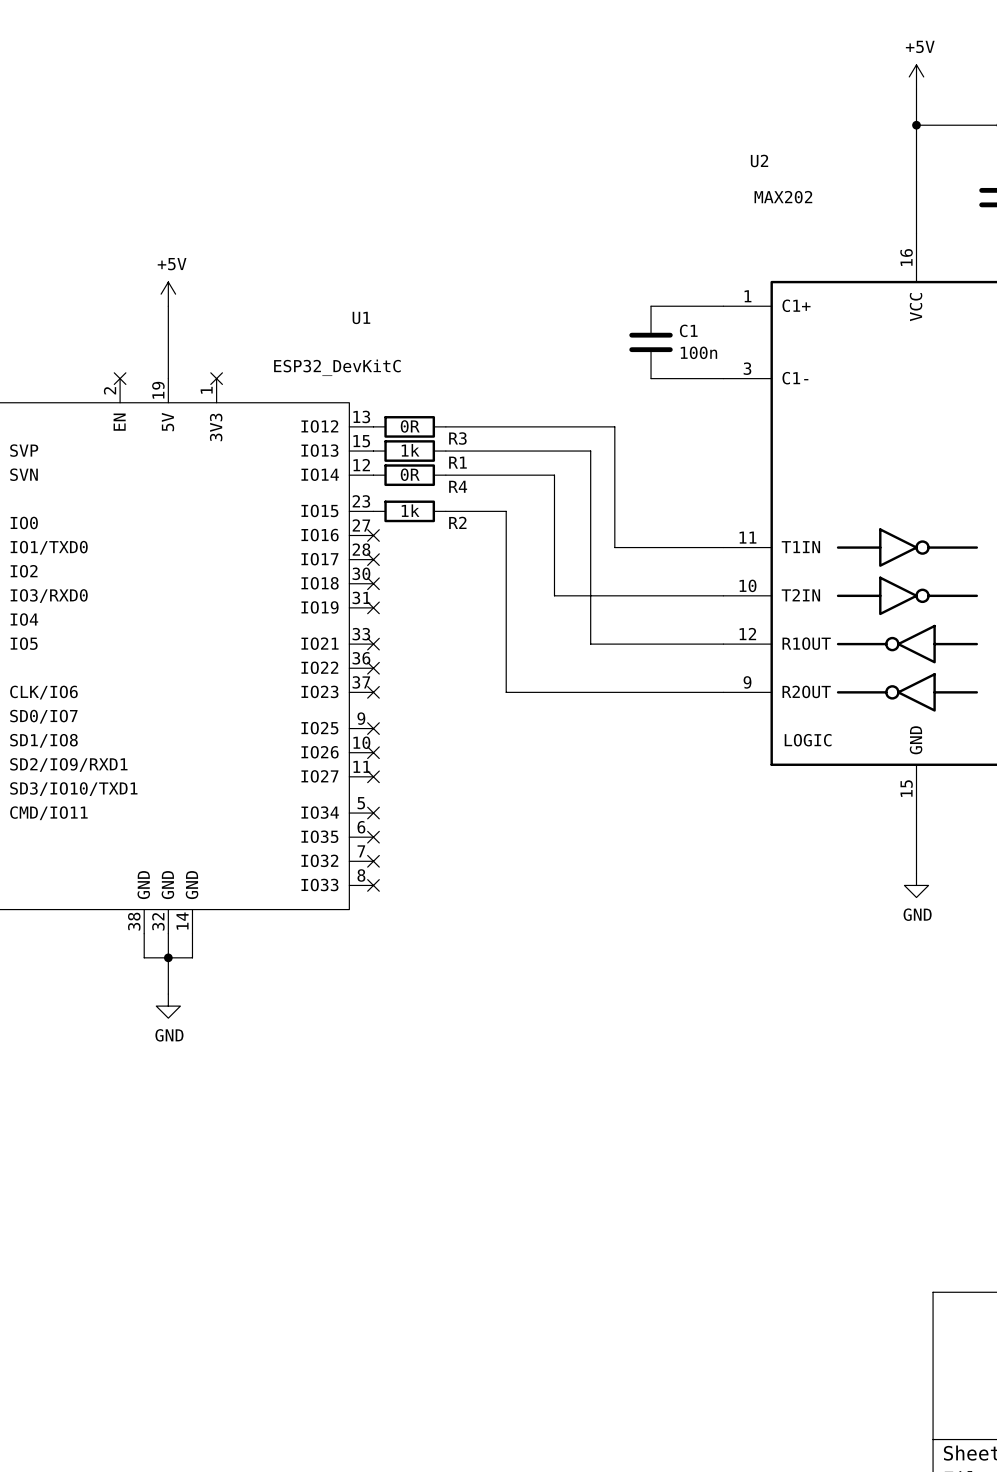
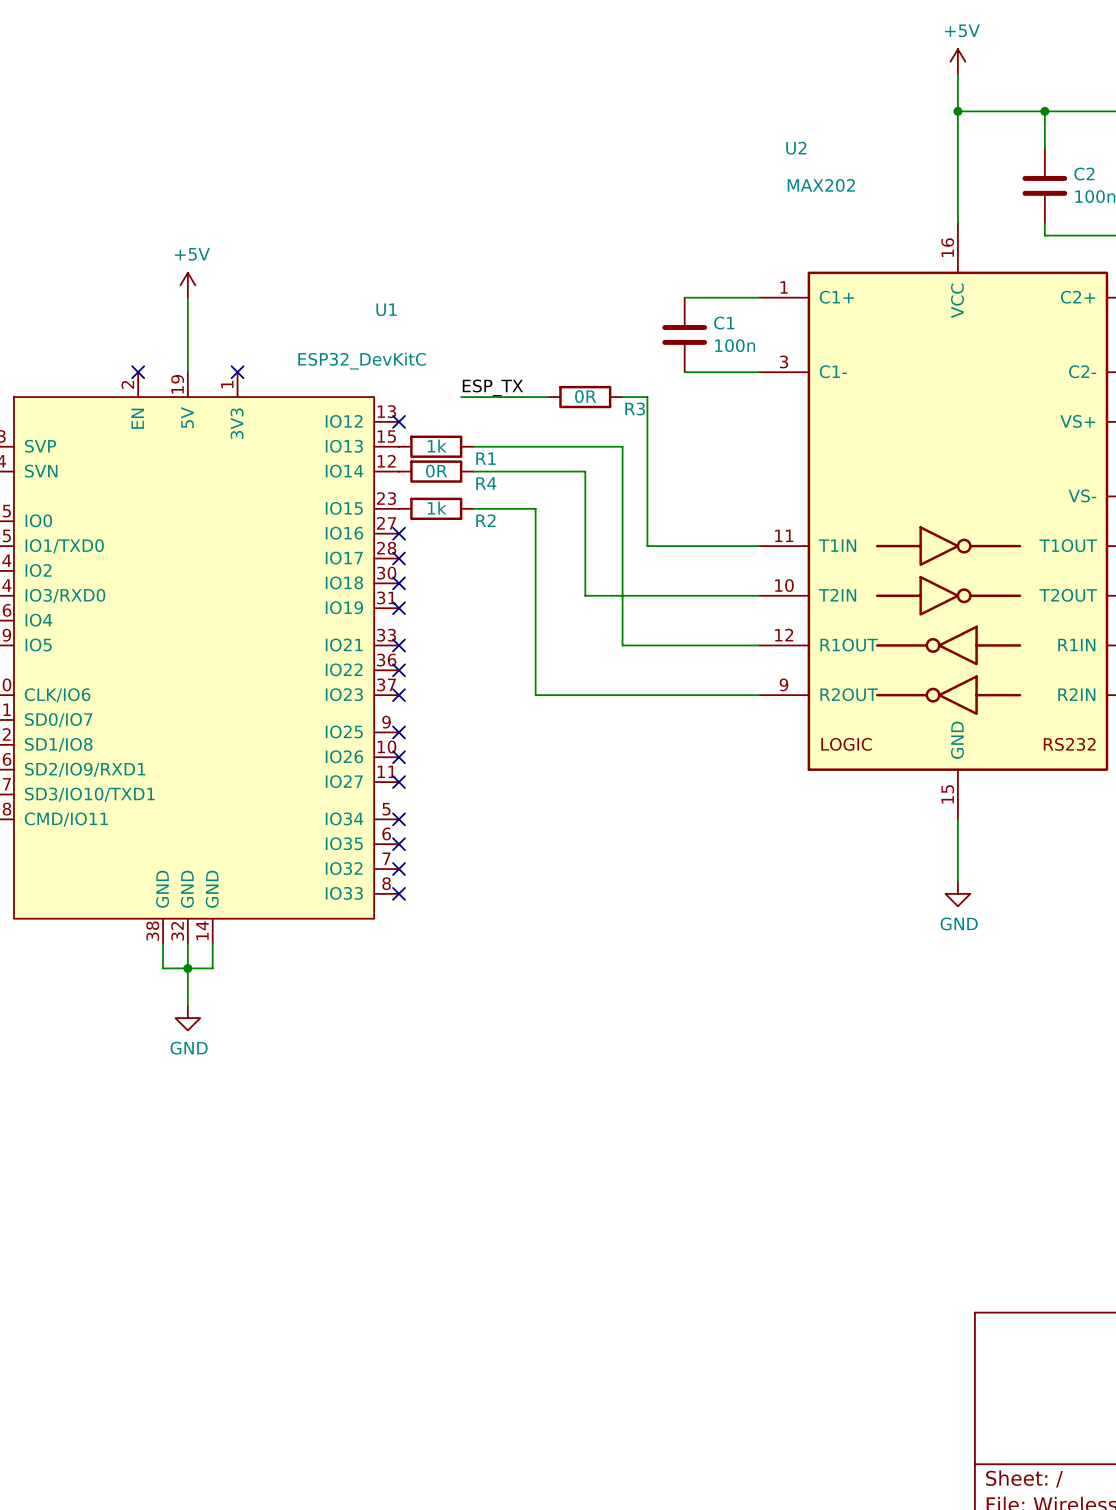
label: none -> ESP_TX (492, 387)
wire: none -> (461, 397) (548, 397)
no-connect mark: none -> (399, 421)
R3 position: (409, 426) -> (585, 397)
wire: (445, 426) (614, 426) -> (622, 397) (647, 397) (647, 421)

